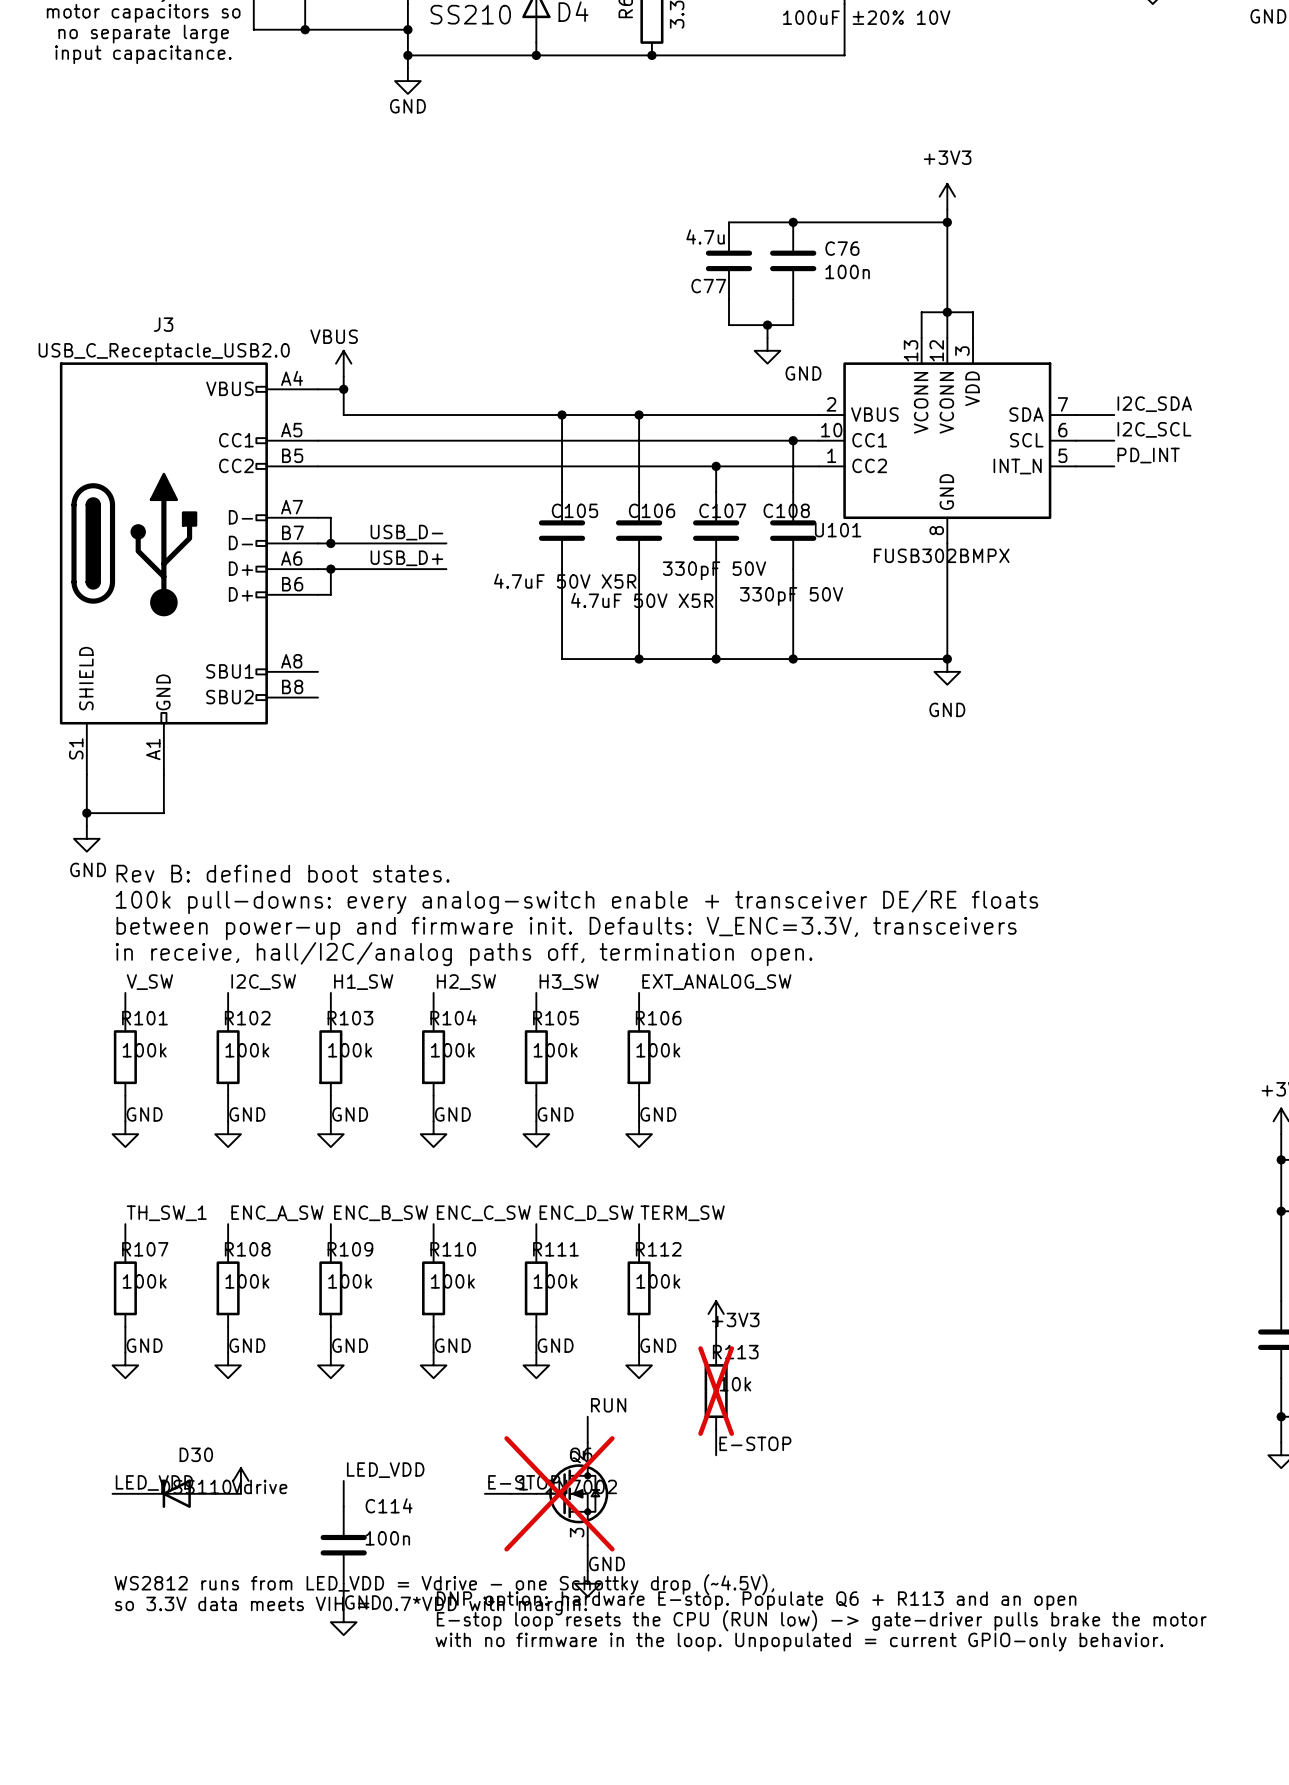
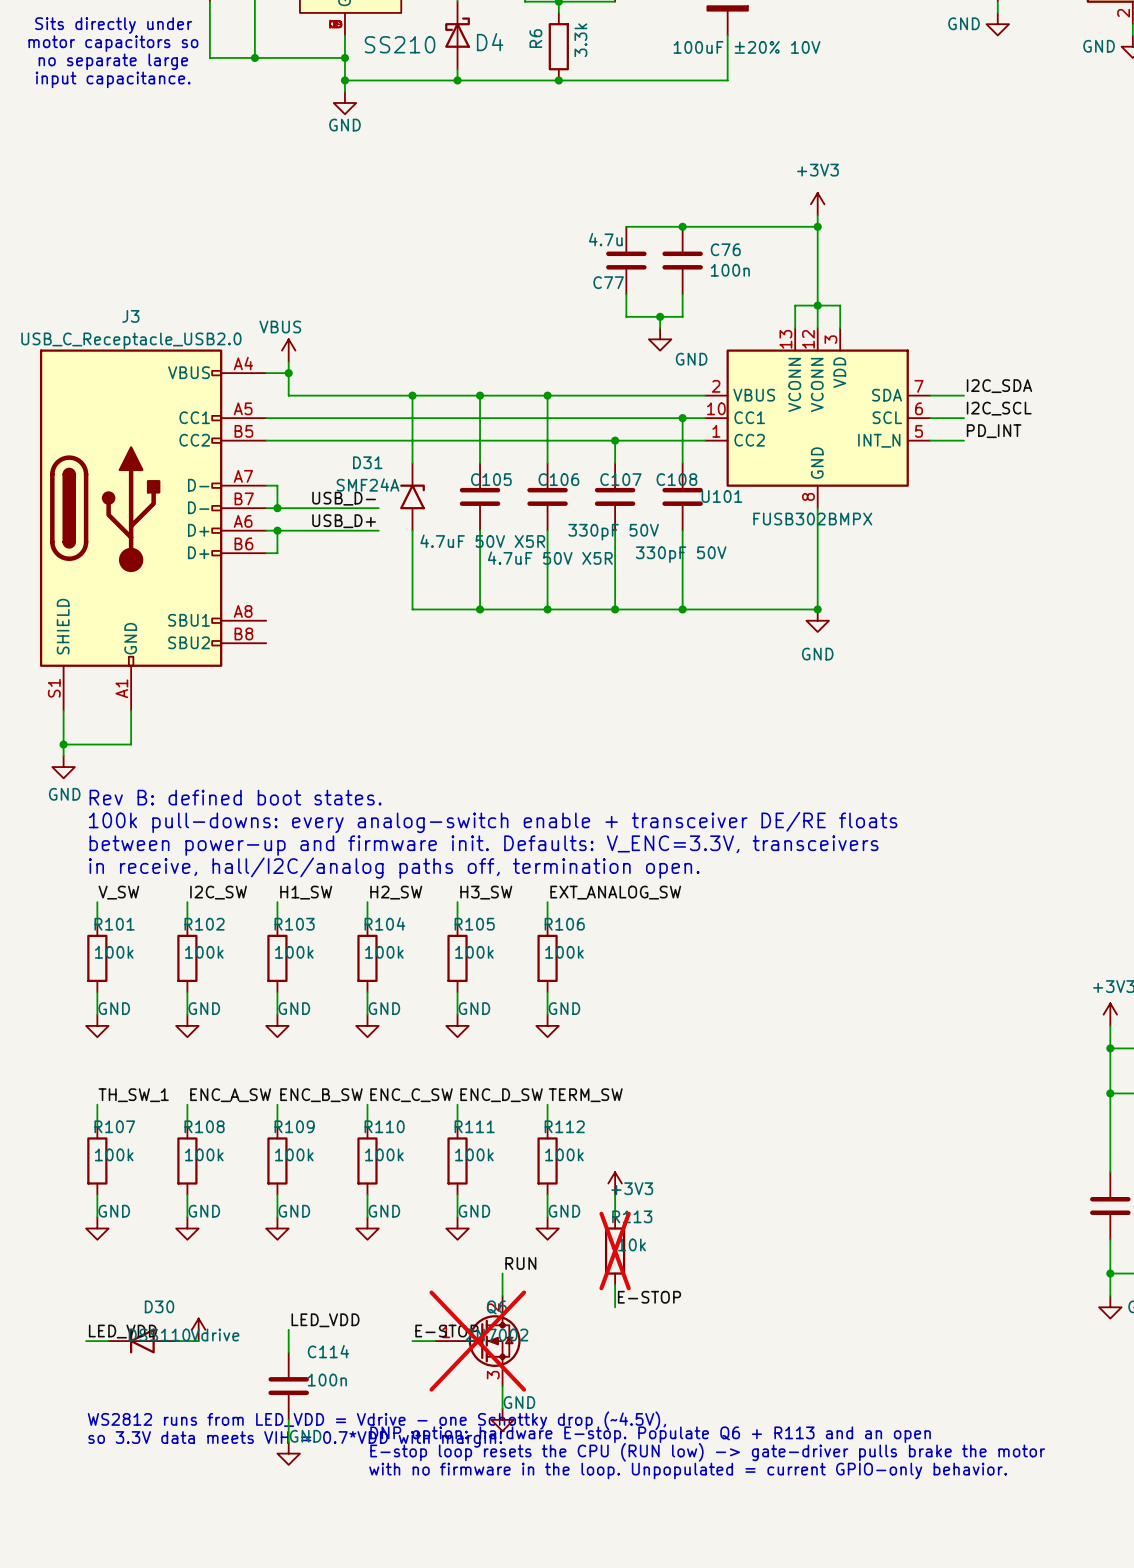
wire: none -> (412, 395) (412, 463)
junction: none -> (412, 395)
D31: none -> SMF24A (412, 496)
wire: none -> (412, 530) (412, 609) (480, 609)
junction: none -> (480, 609)

